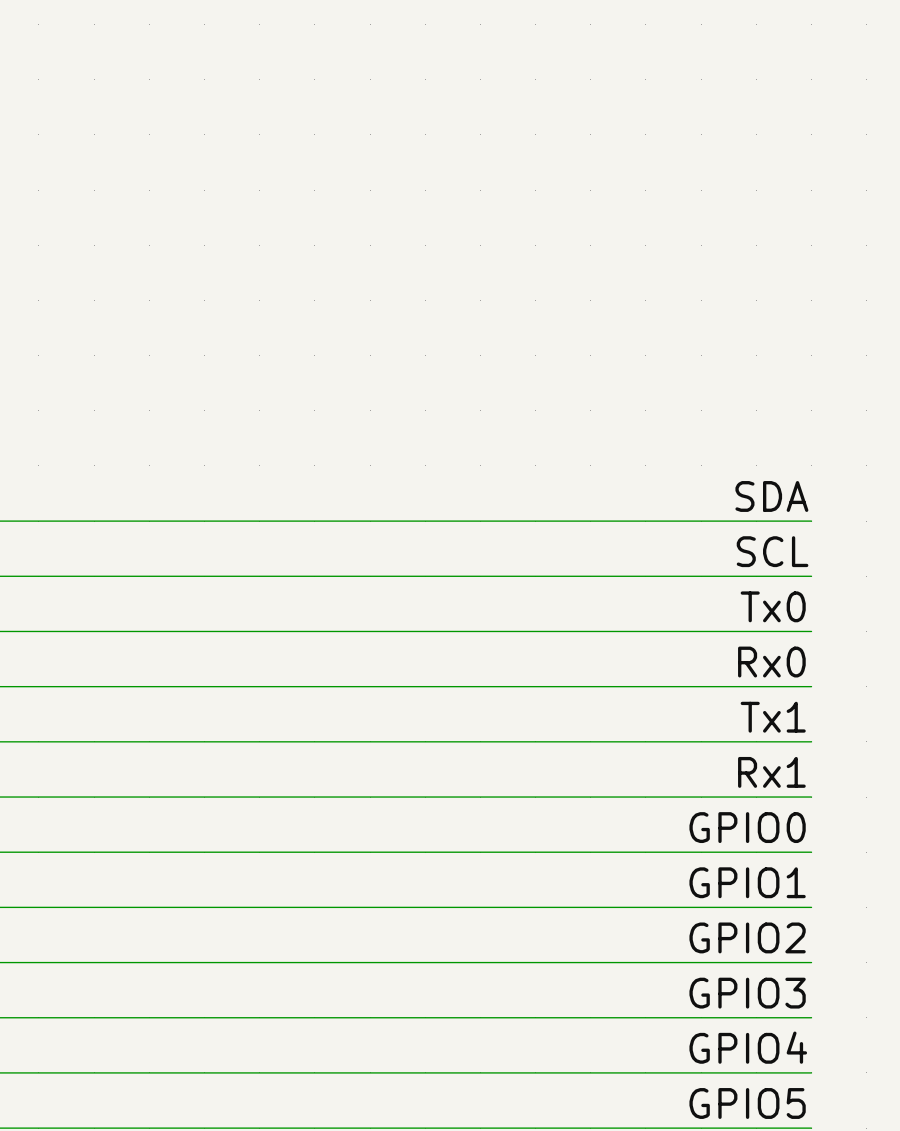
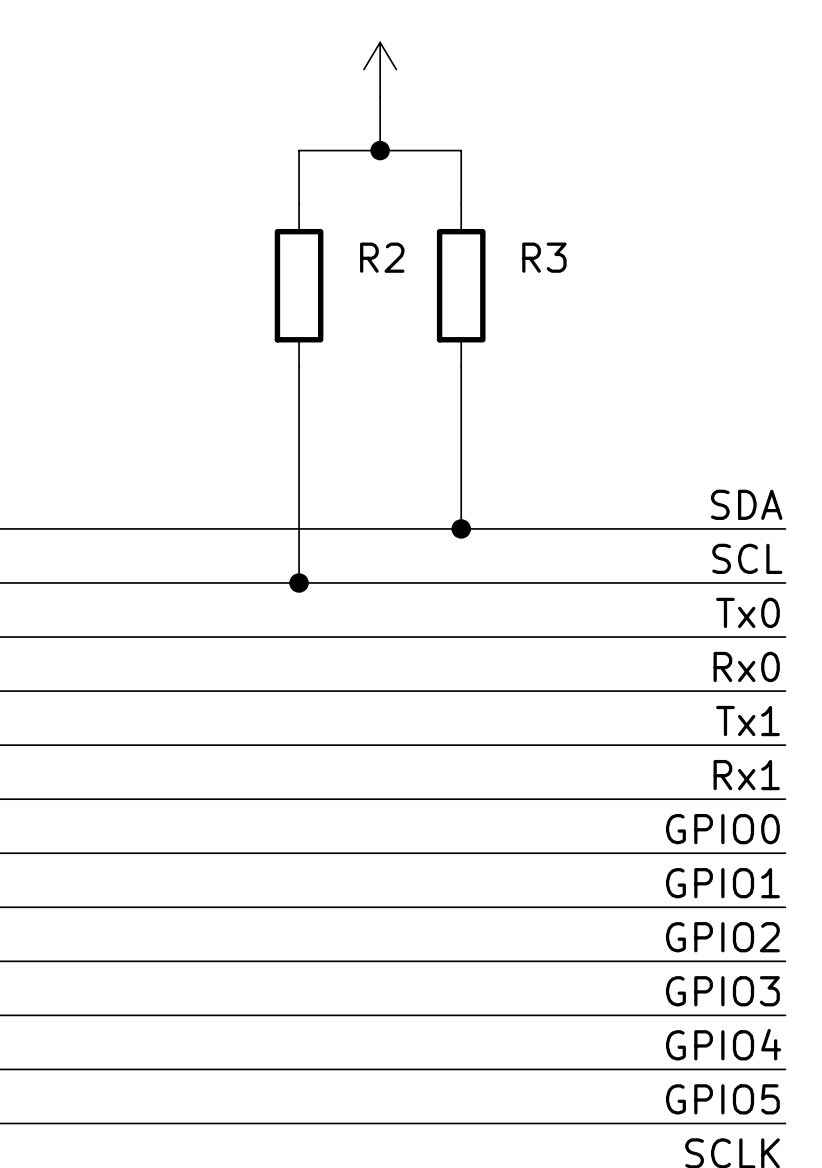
power symbol: none -> (380, 69)
wire: none -> (380, 96) (380, 150)
junction: none -> (380, 150)
wire: none -> (299, 204) (299, 150) (461, 150) (461, 204)
R2: none -> (299, 285)
R3: none -> (461, 285)
wire: none -> (299, 366) (299, 582)
wire: none -> (461, 366) (461, 528)
junction: none -> (461, 528)
junction: none -> (299, 582)

